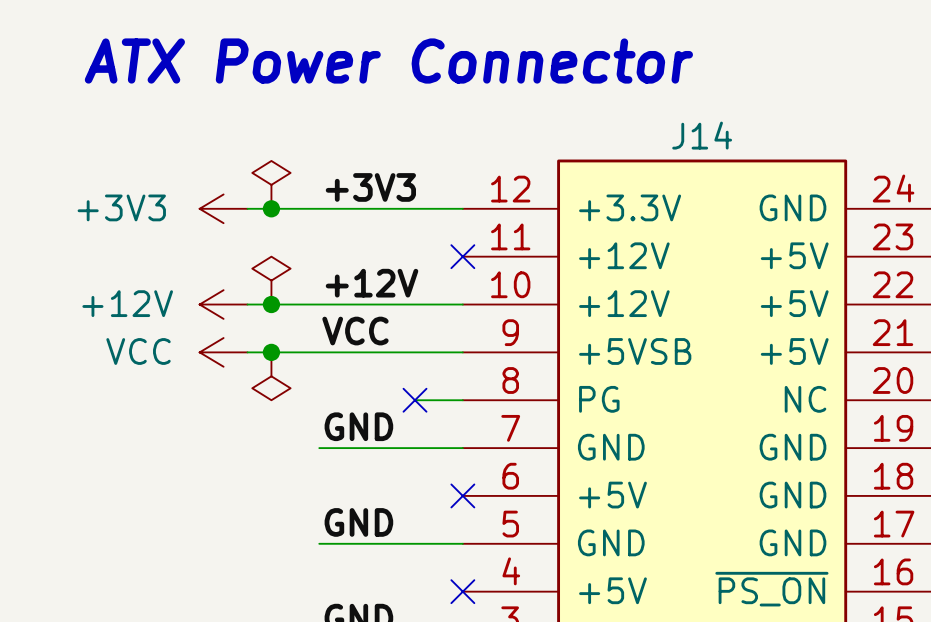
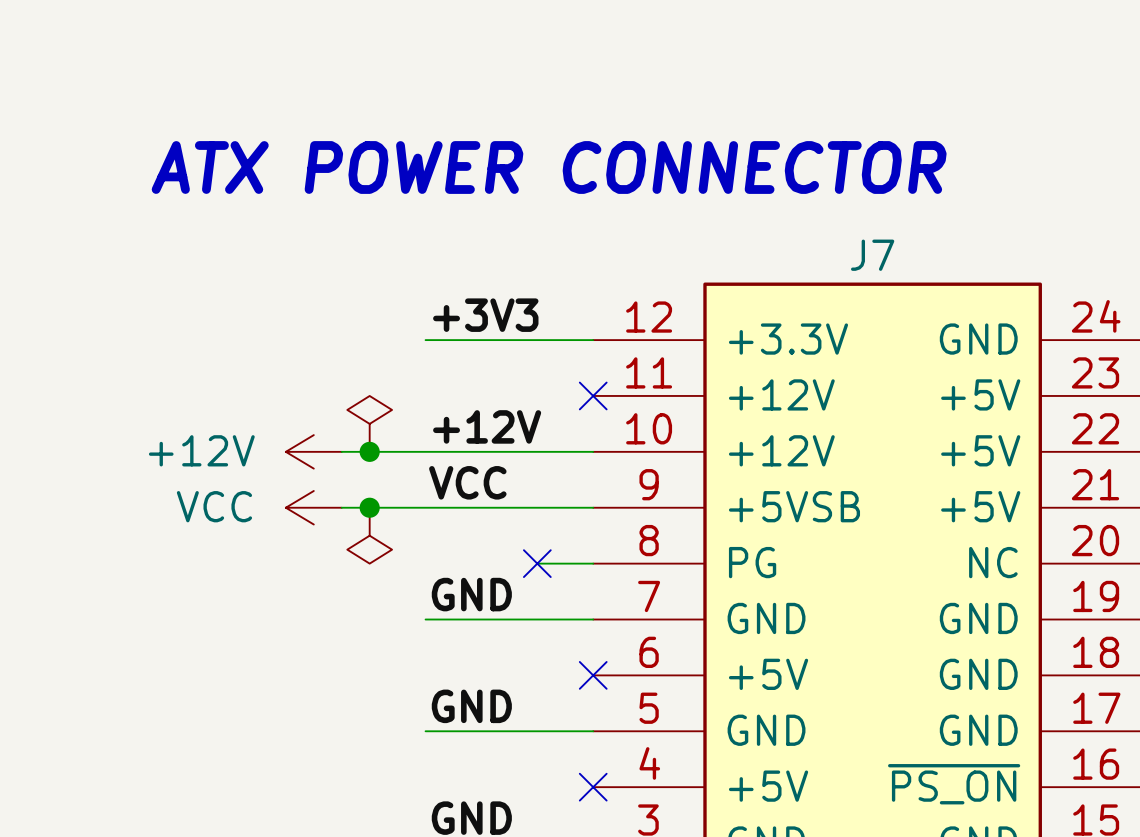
text: ATX Power Connector (388, 61) -> ATX POWER CONNECTOR (549, 167)
J14 name: J14 (702, 135) -> J7 (872, 255)
power symbol: (271, 184) -> none
power symbol: +3V3 (223, 208) -> none
wire: (247, 208) (319, 208) -> none
junction: (271, 208) -> none

